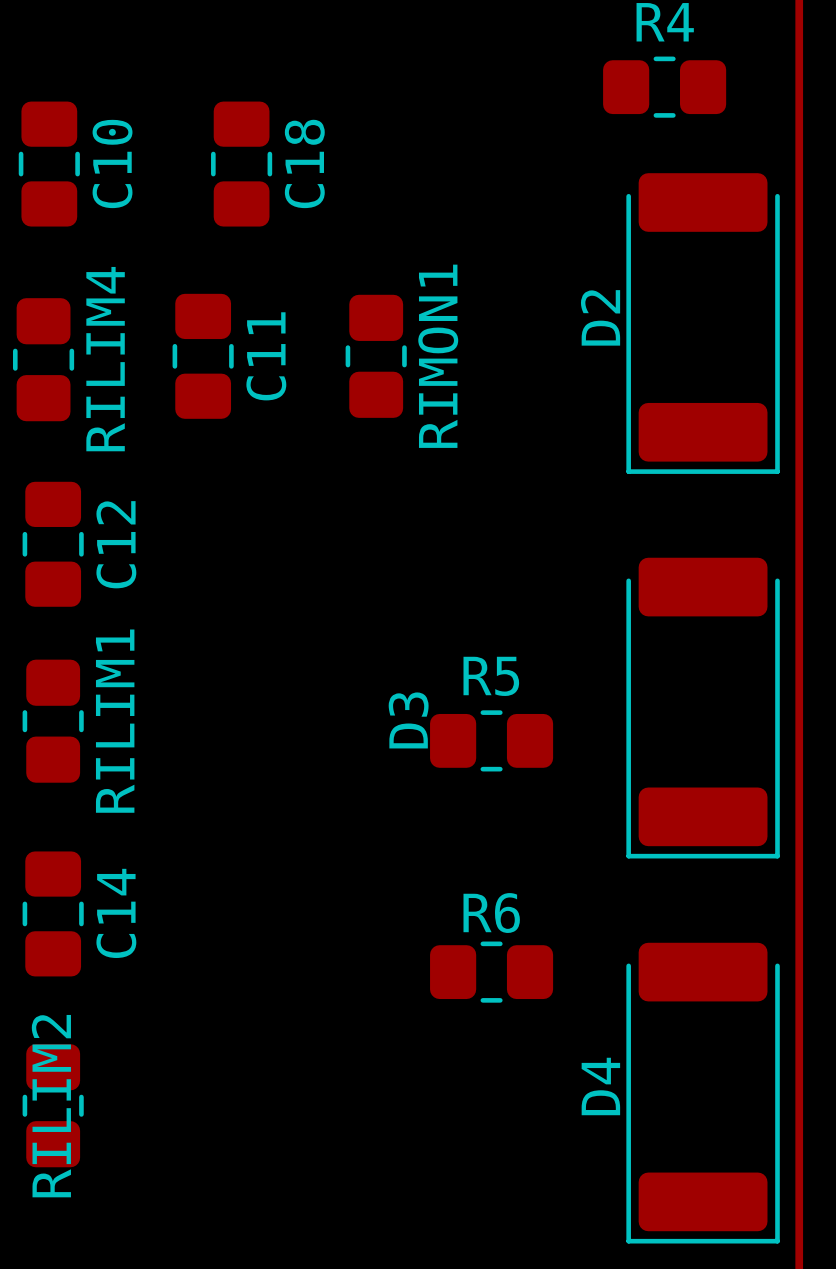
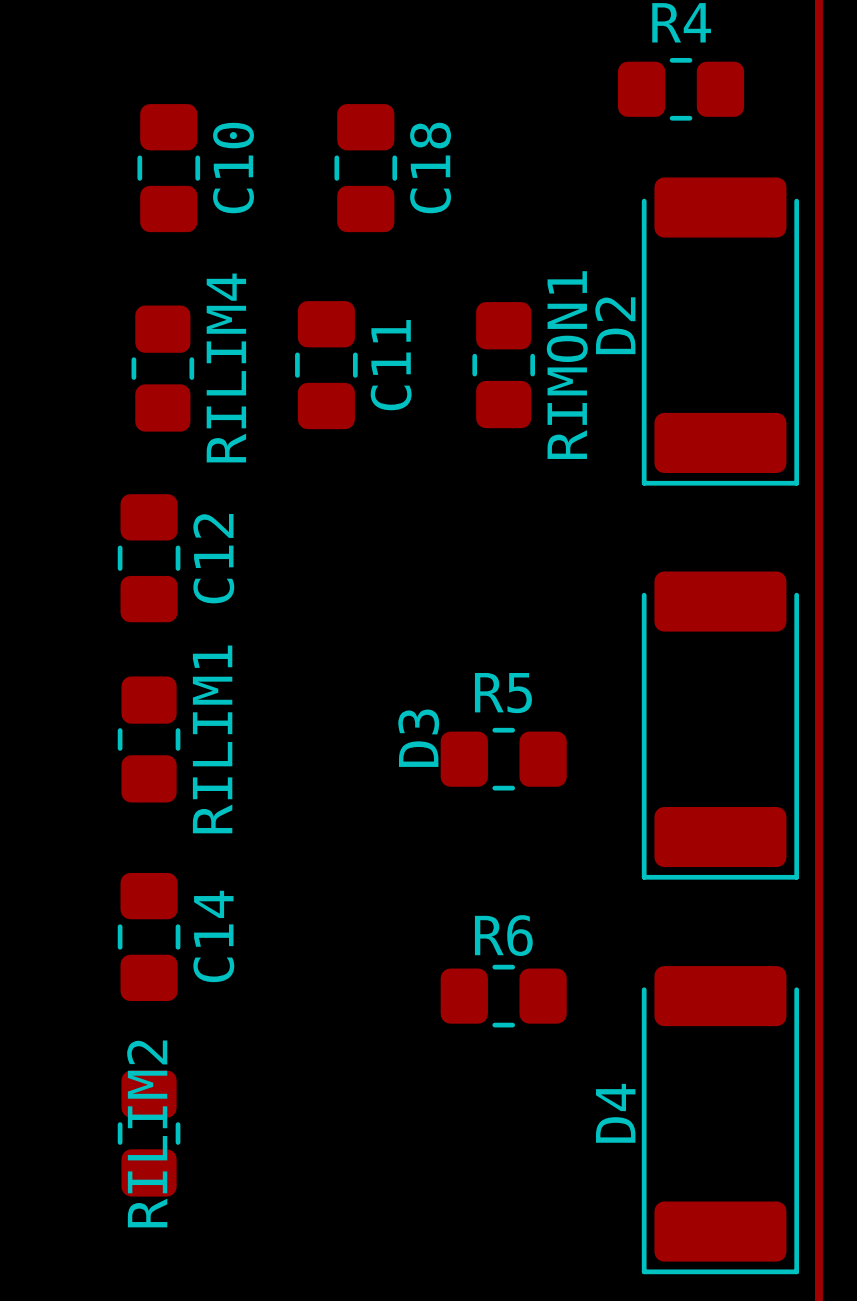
C10 position: (49, 164) -> (168, 168)
C18 position: (241, 164) -> (365, 168)
C11 position: (203, 356) -> (326, 365)
RIMON1 position: (376, 356) -> (503, 365)
RILIM4 position: (43, 359) -> (162, 368)
C12 position: (53, 544) -> (149, 558)
RILIM1 position: (53, 721) -> (149, 739)
C14 position: (53, 913) -> (149, 937)
RILIM2 position: (53, 1105) -> (149, 1133)

